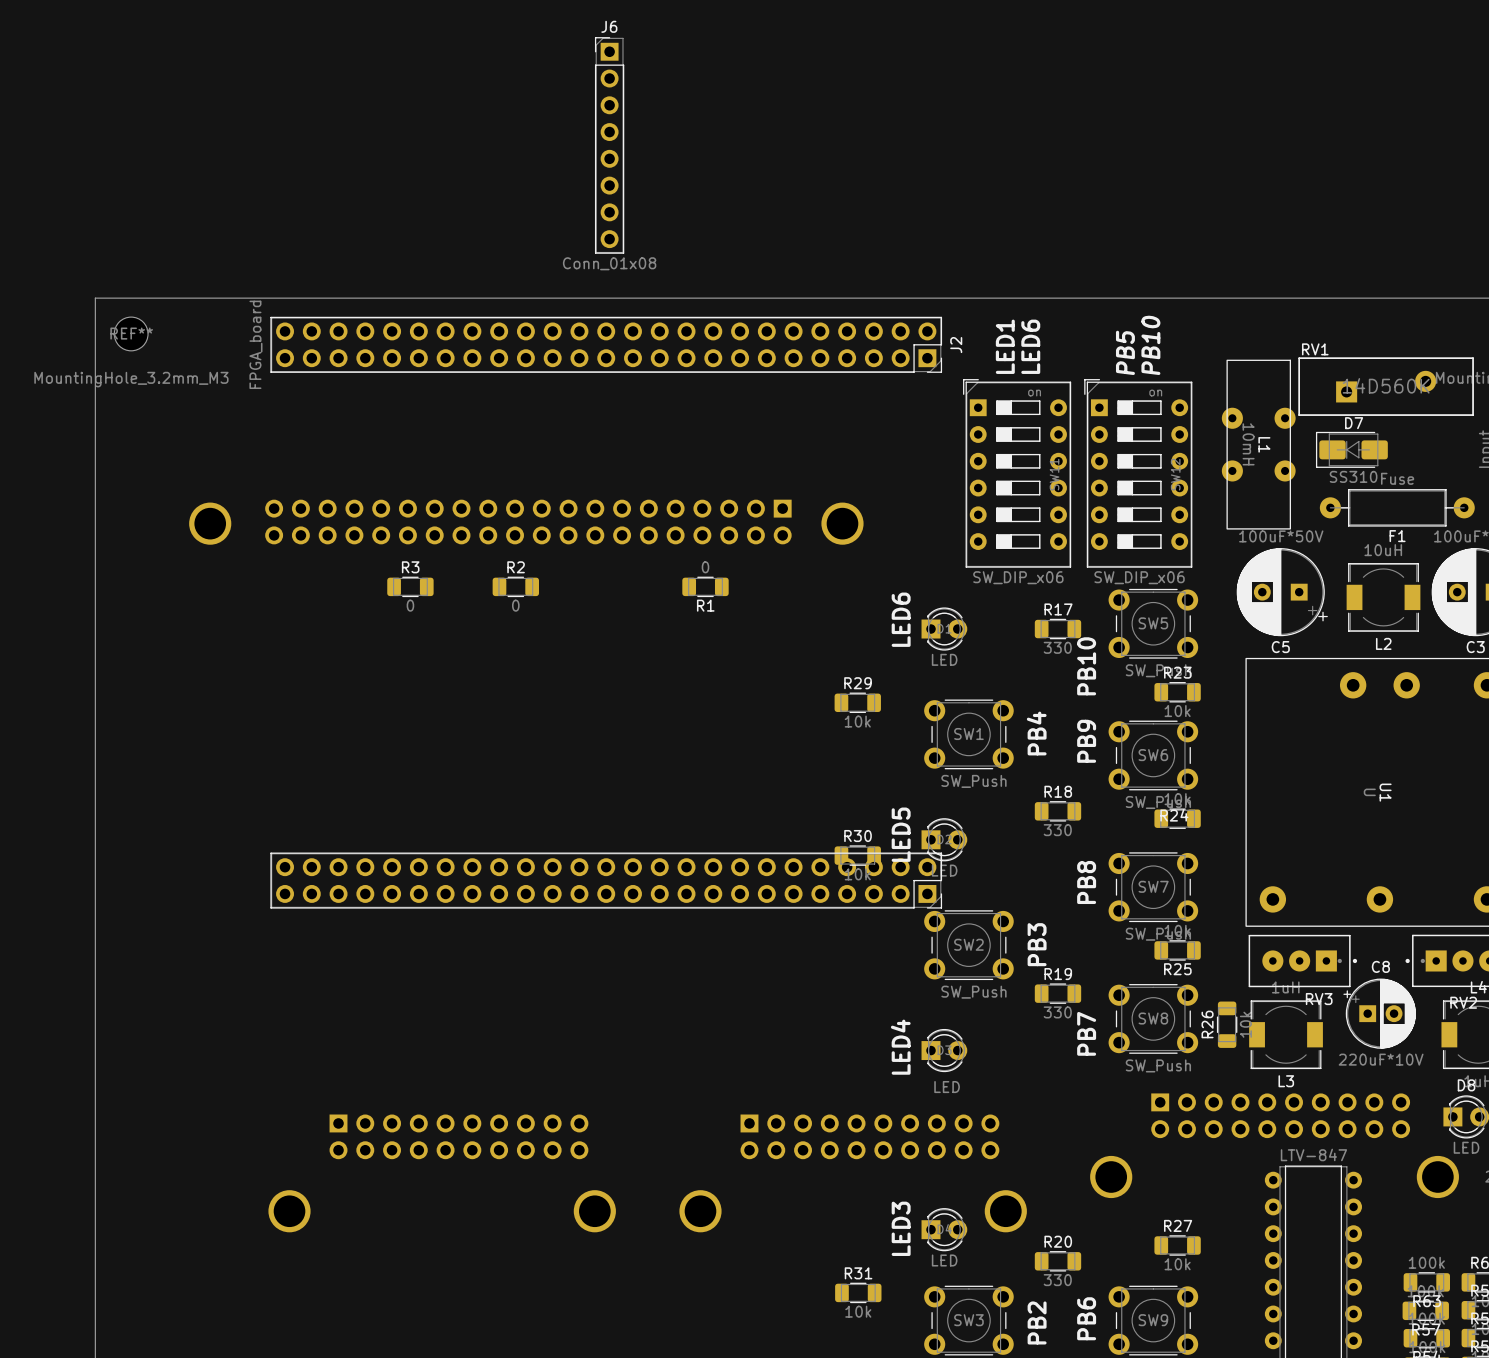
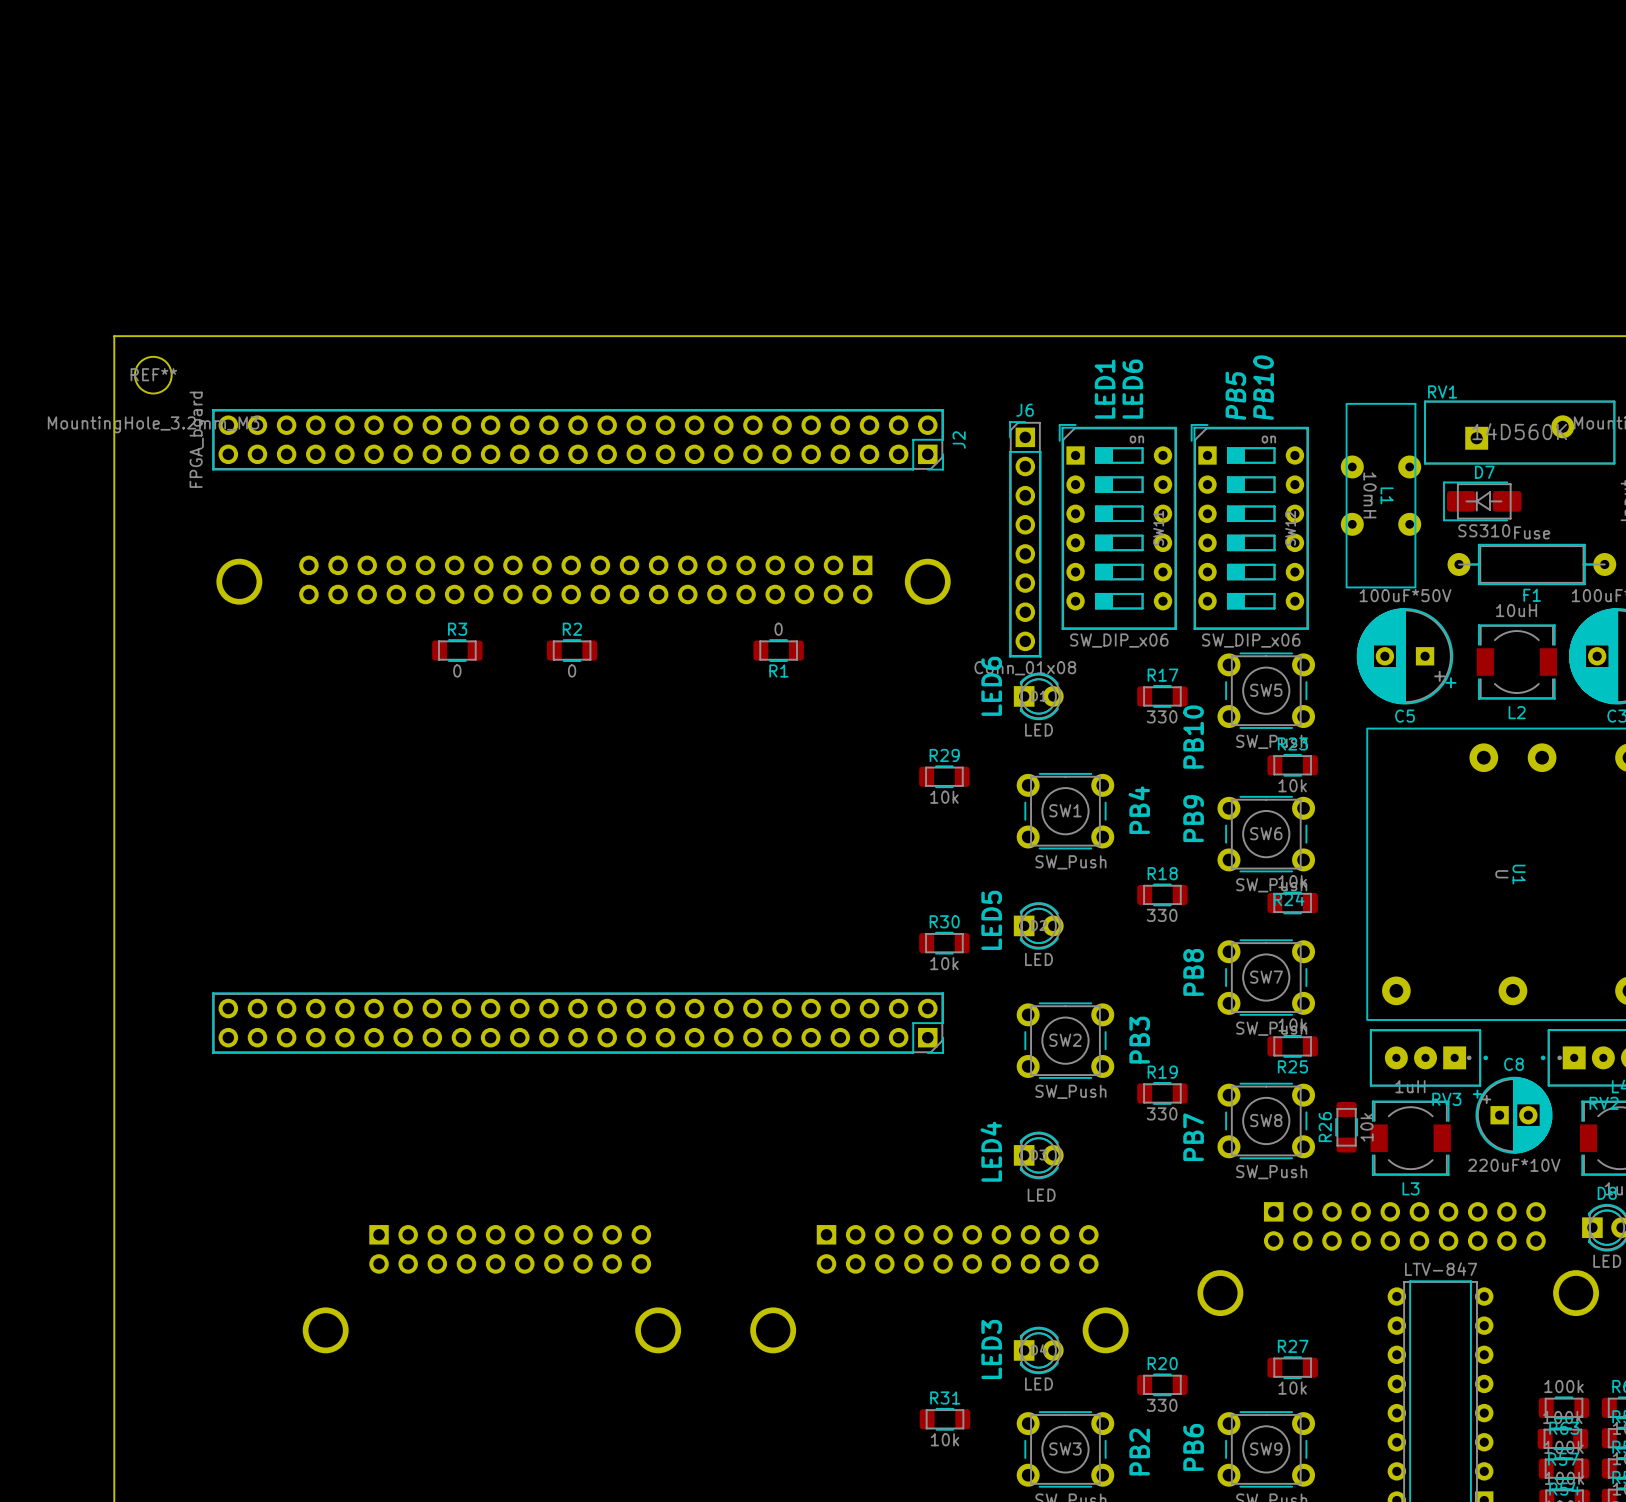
J6 position: (609, 145) -> (1025, 539)
J2 position: (606, 612) -> (578, 731)

